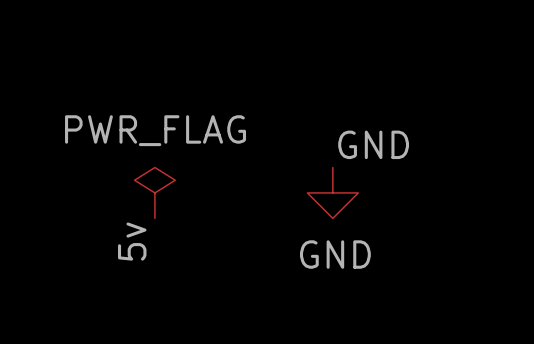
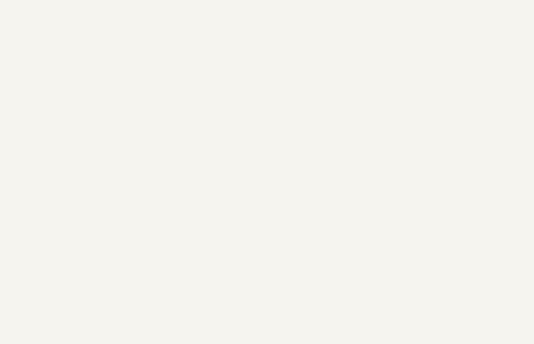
label: GND (373, 144) -> none
power symbol: PWR_FLAG (154, 192) -> none
power symbol: GND (332, 192) -> none
label: 5v (132, 241) -> none

